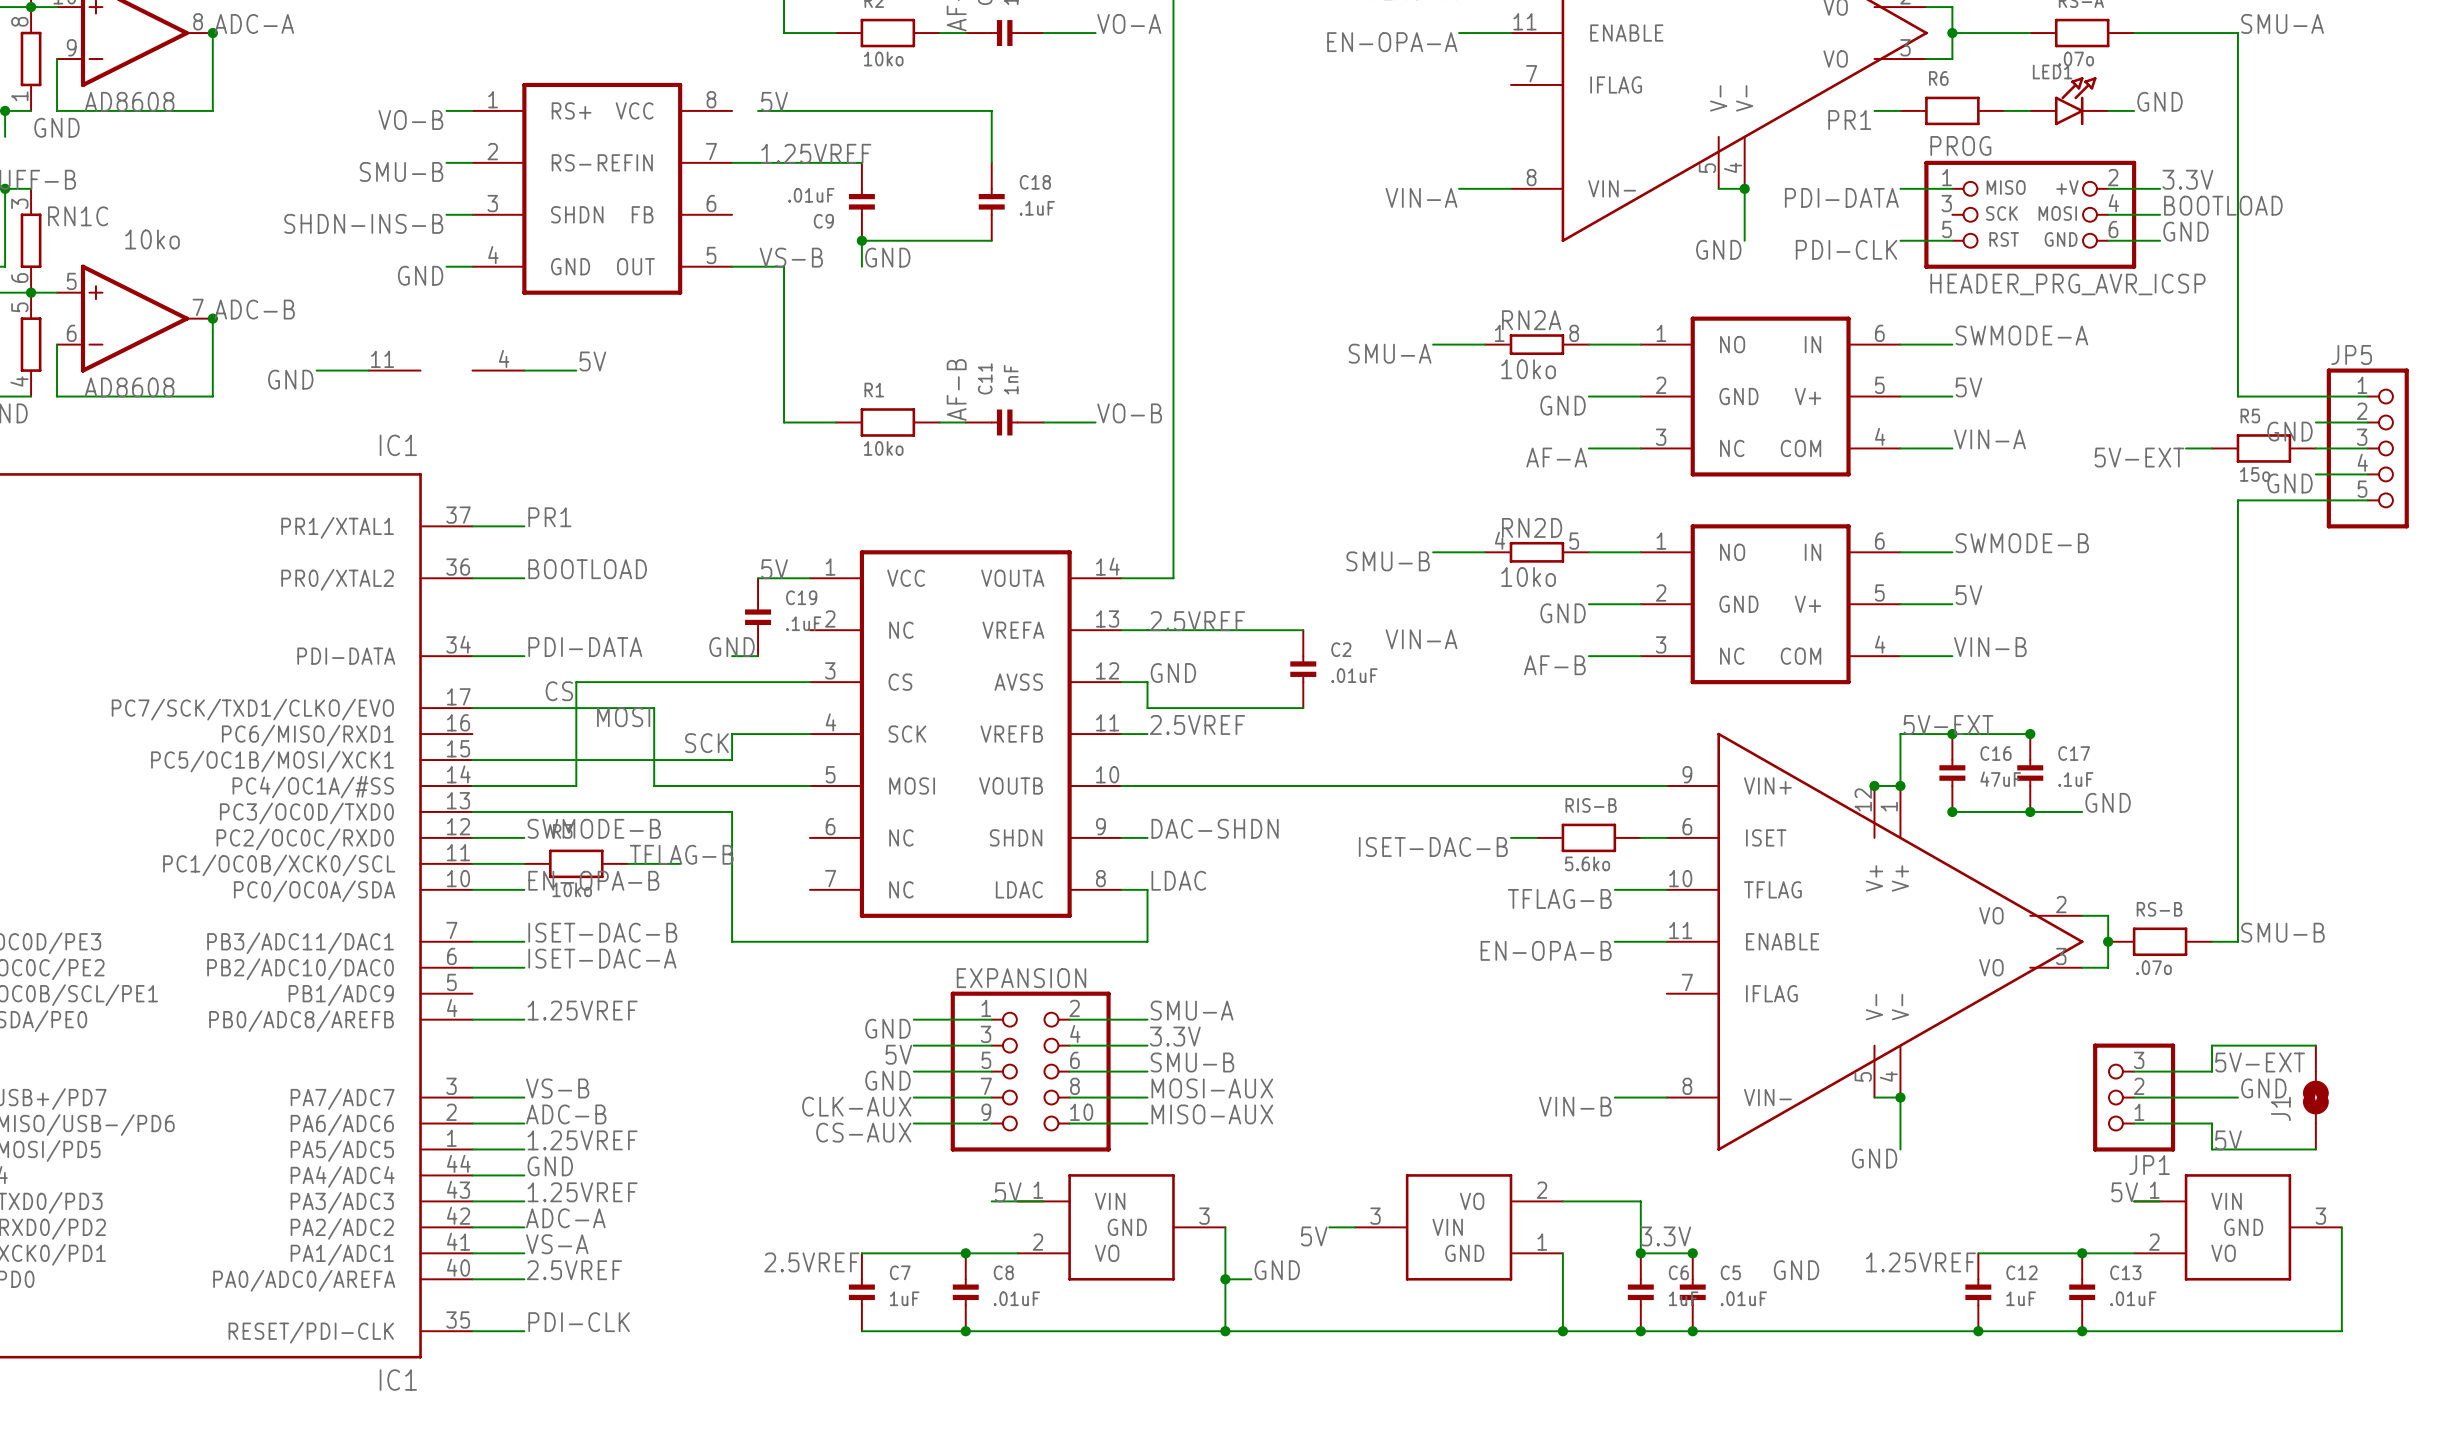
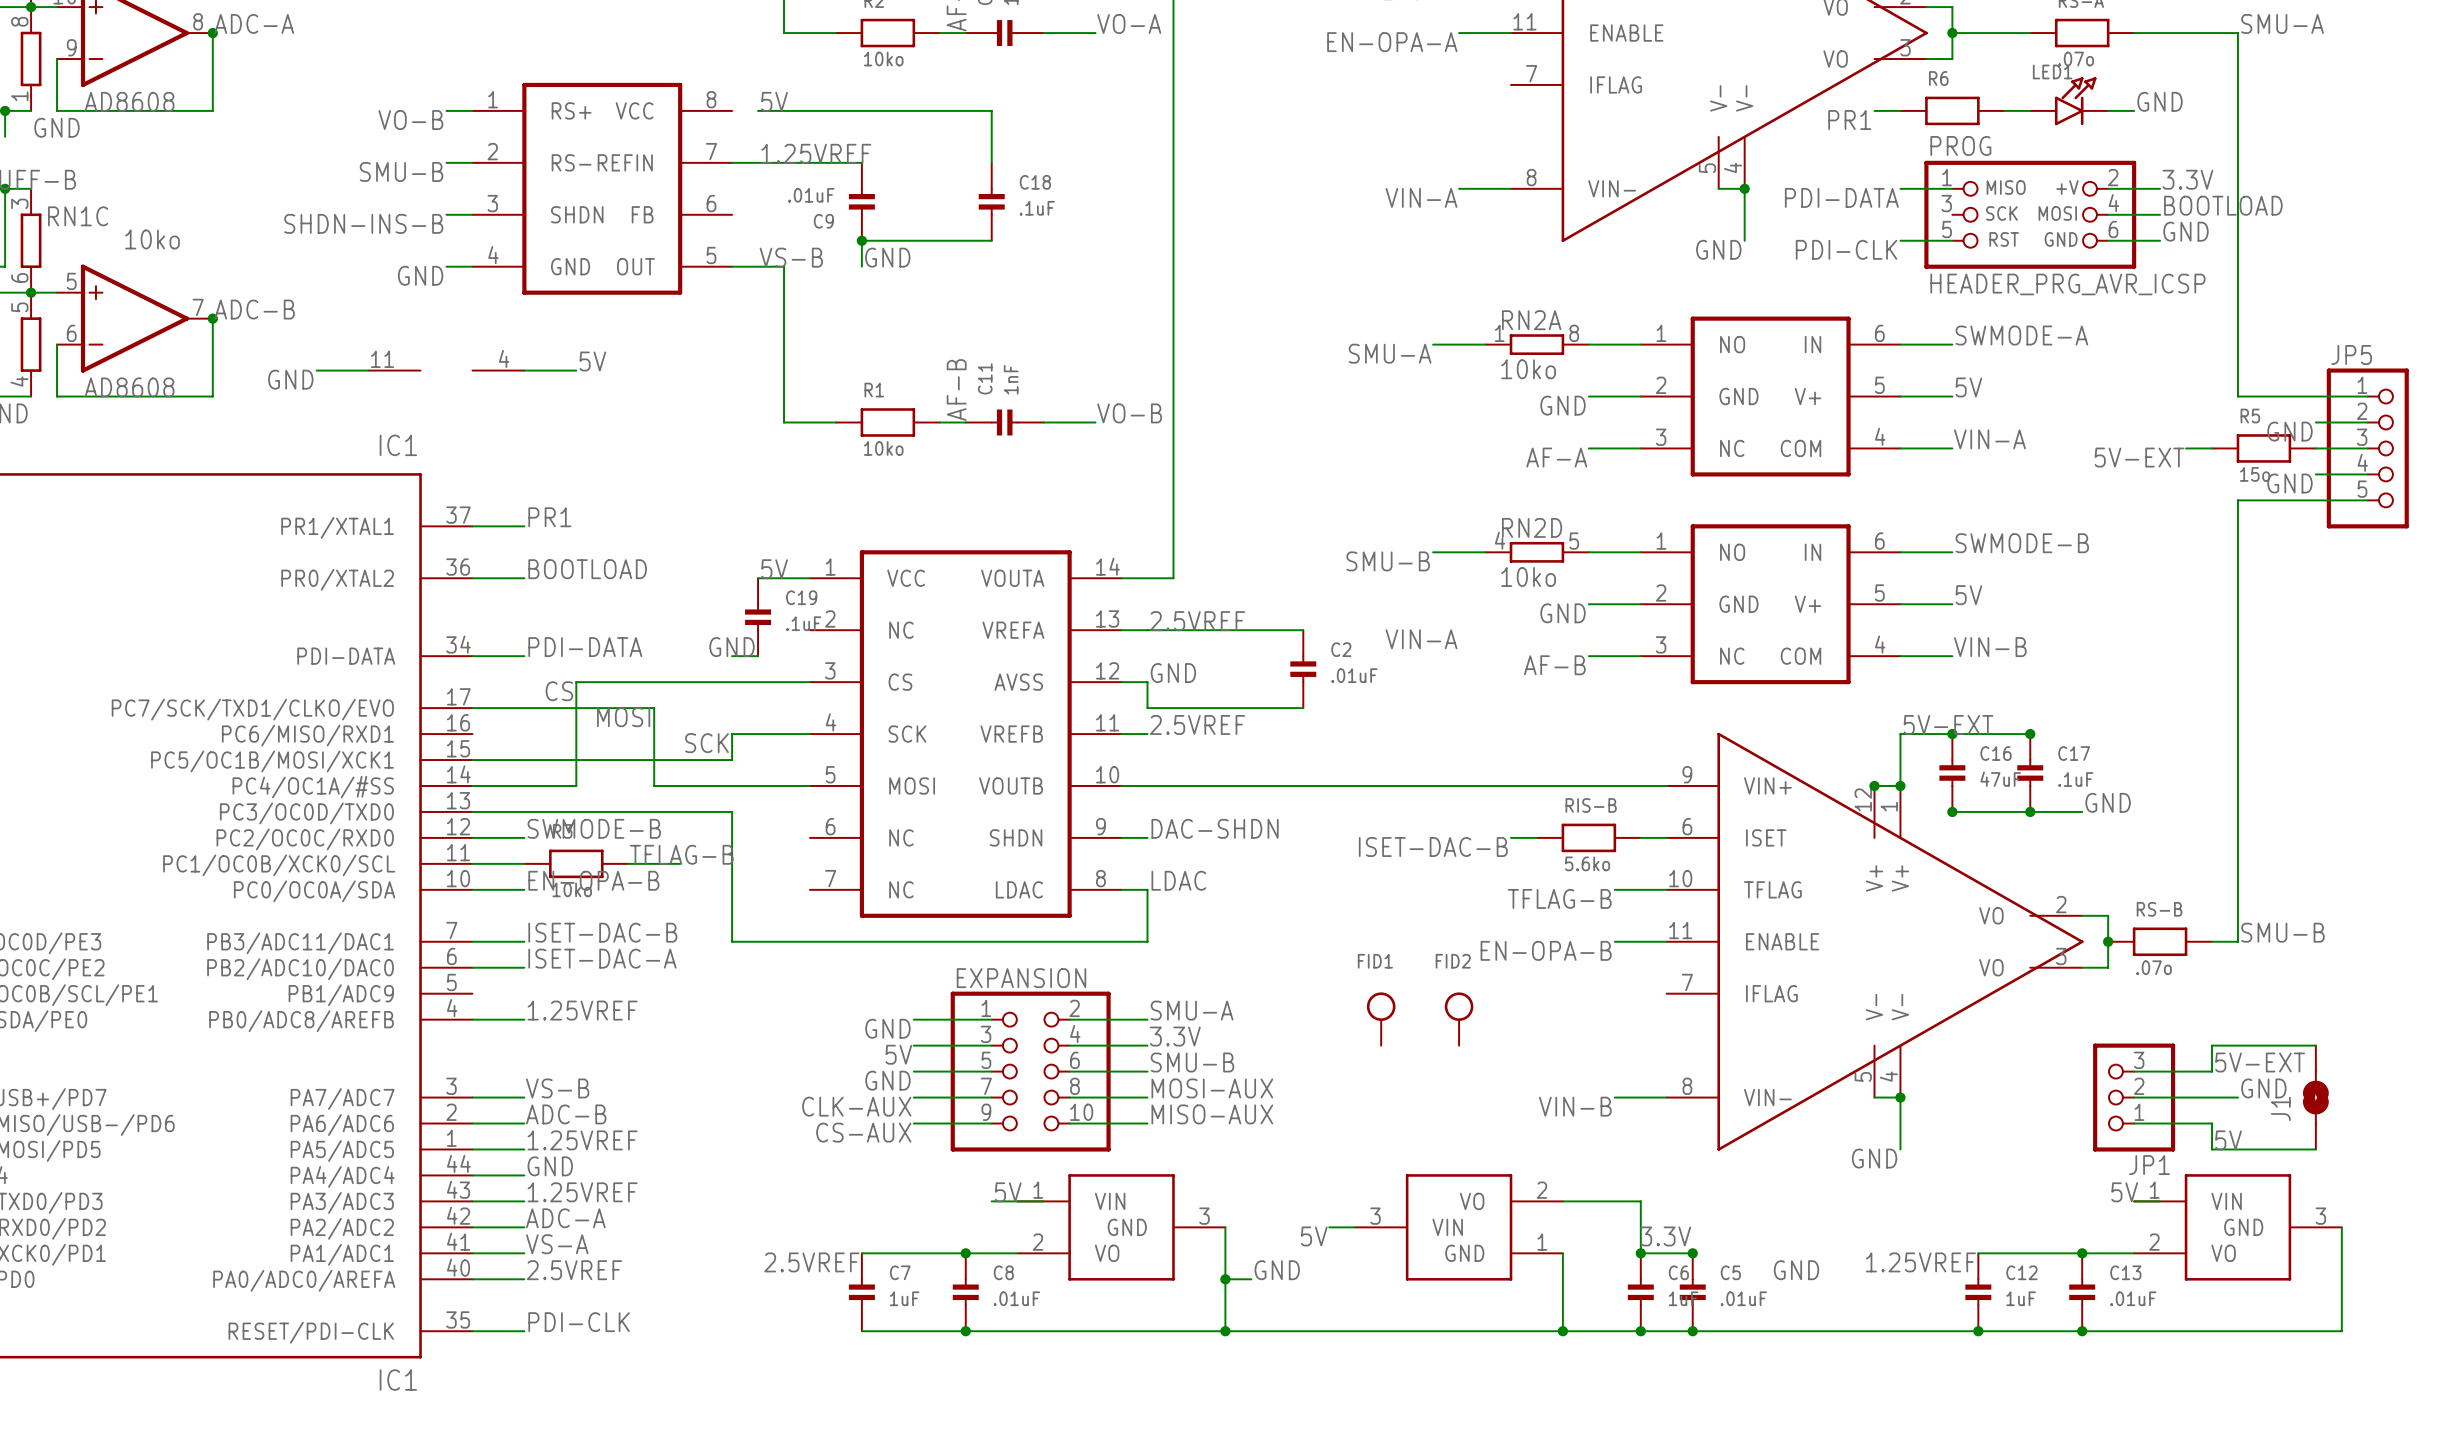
FID1: none -> (1381, 1019)
FID2: none -> (1459, 1019)

